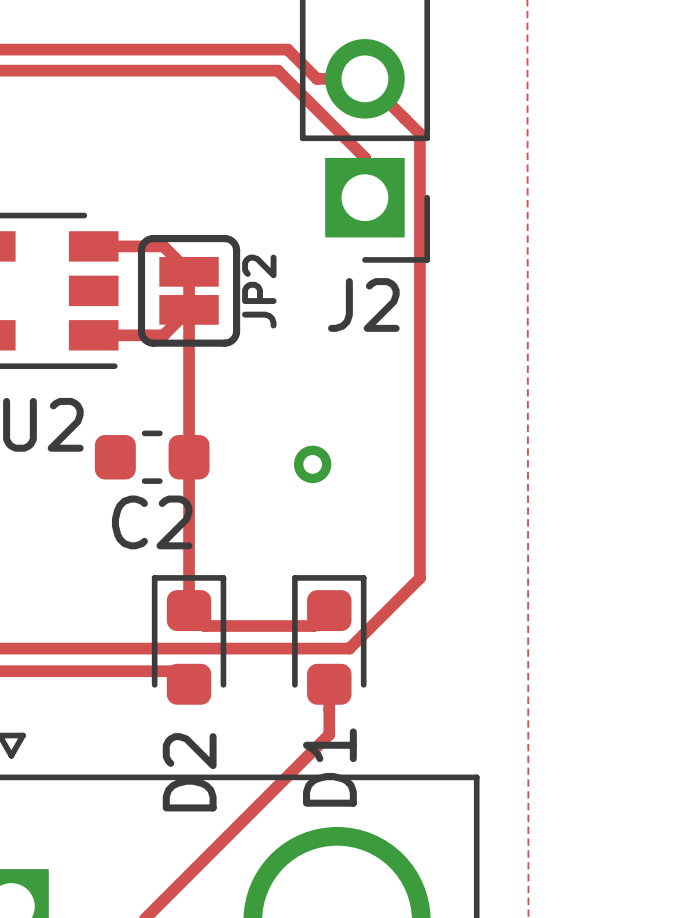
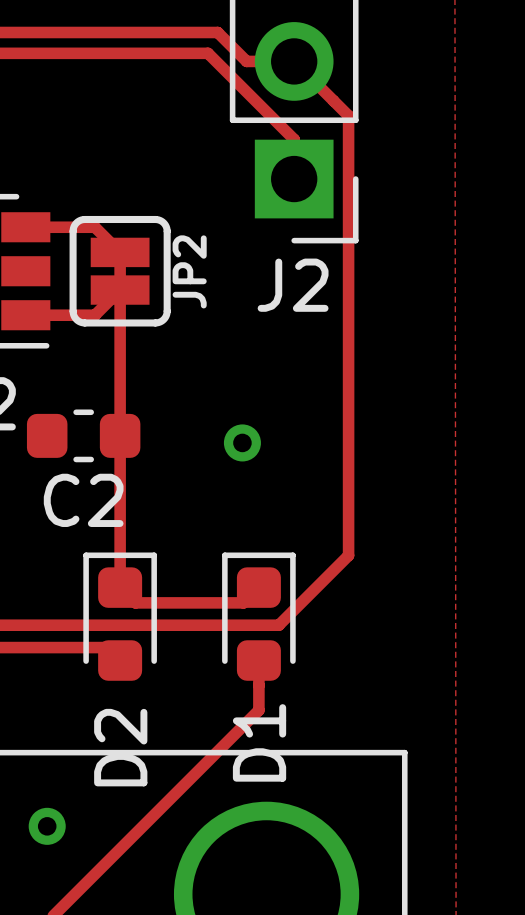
via: none -> (47, 826)

